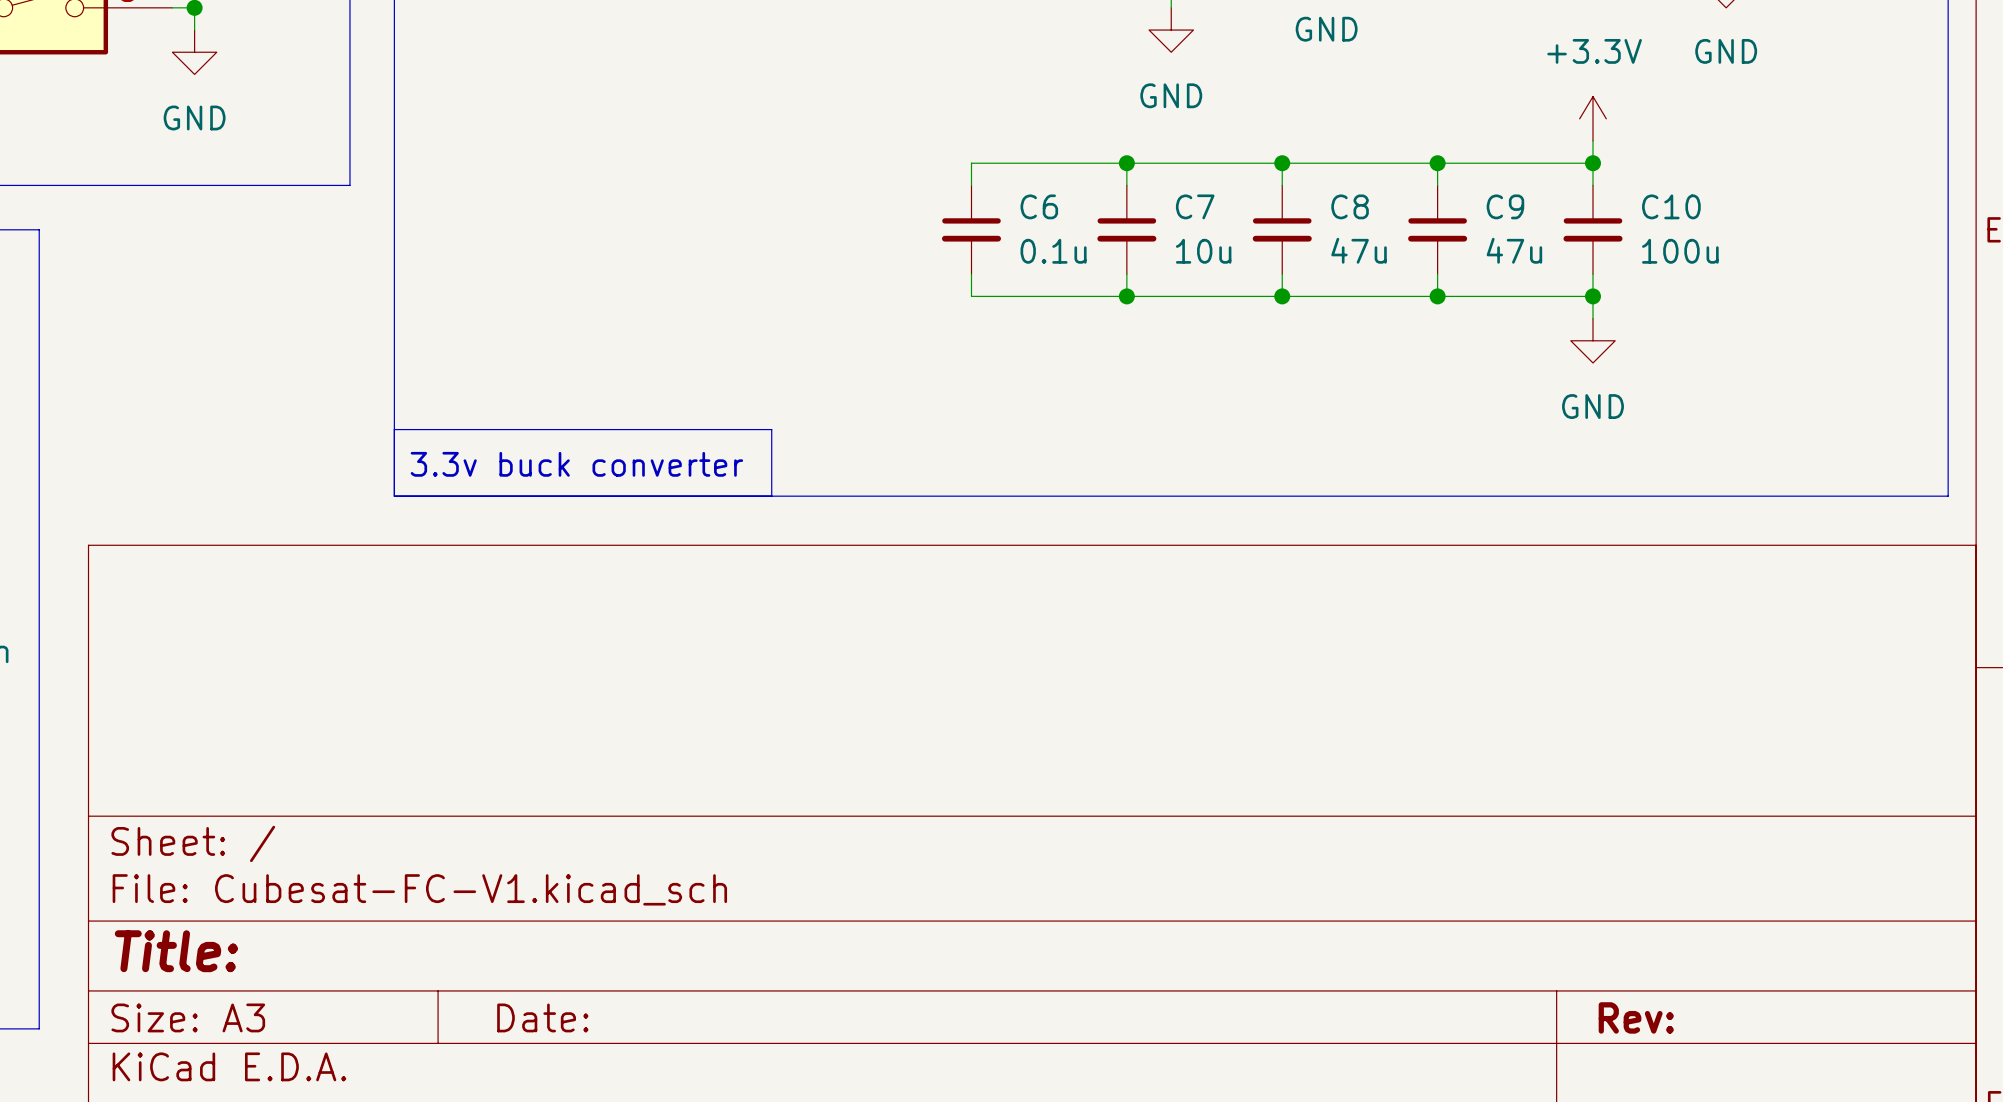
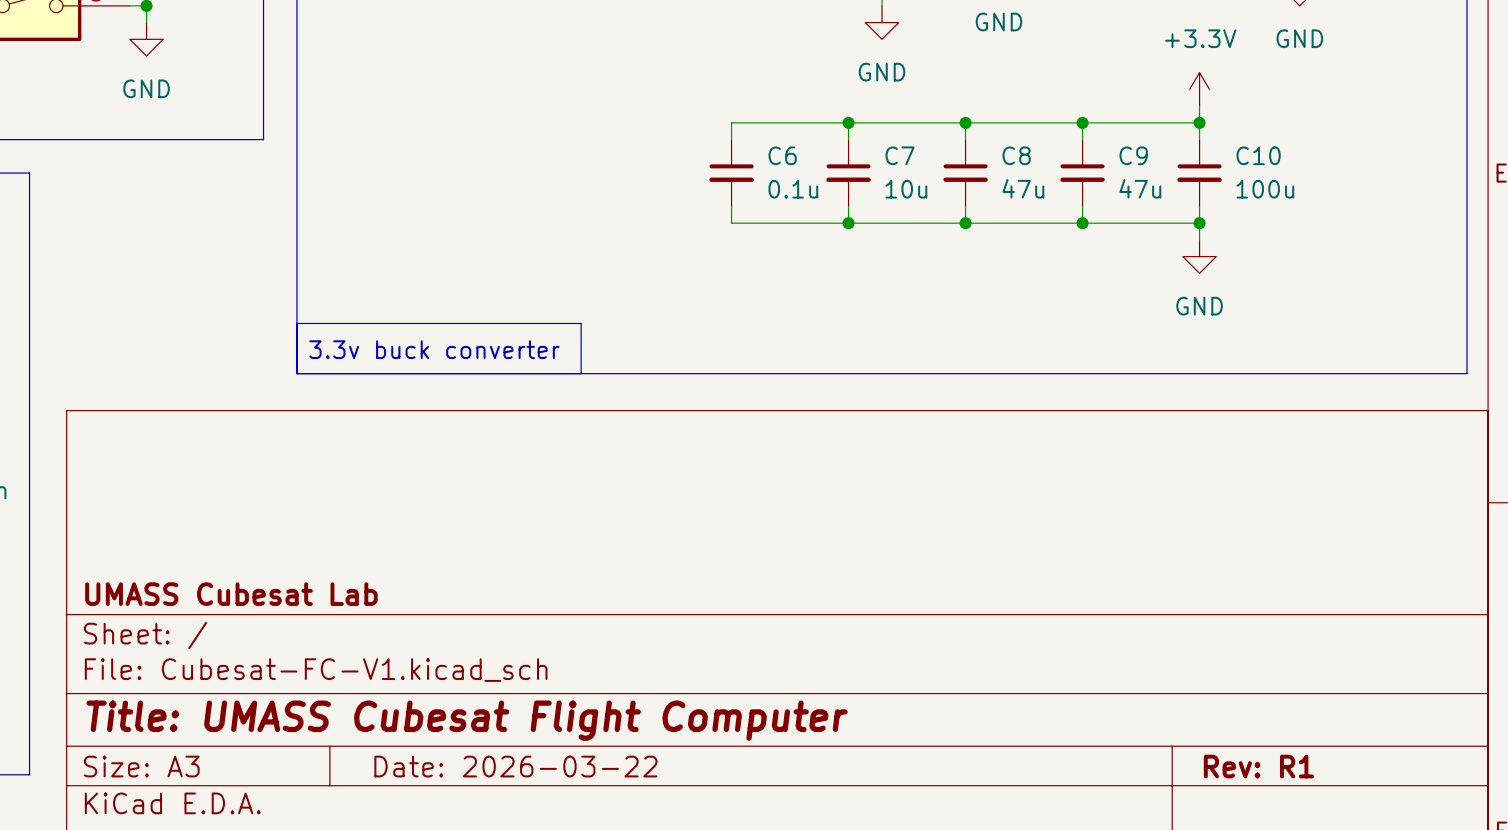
title block: none -> UMASS Cubesat Lab (231, 594)
title block: Title: (176, 951) -> Title: UMASS Cubesat Flight Computer (467, 720)
title block: Date: (542, 1017) -> Date: 2026-03-22 (515, 766)
title block: Rev: (1636, 1017) -> Rev: R1 (1258, 766)

